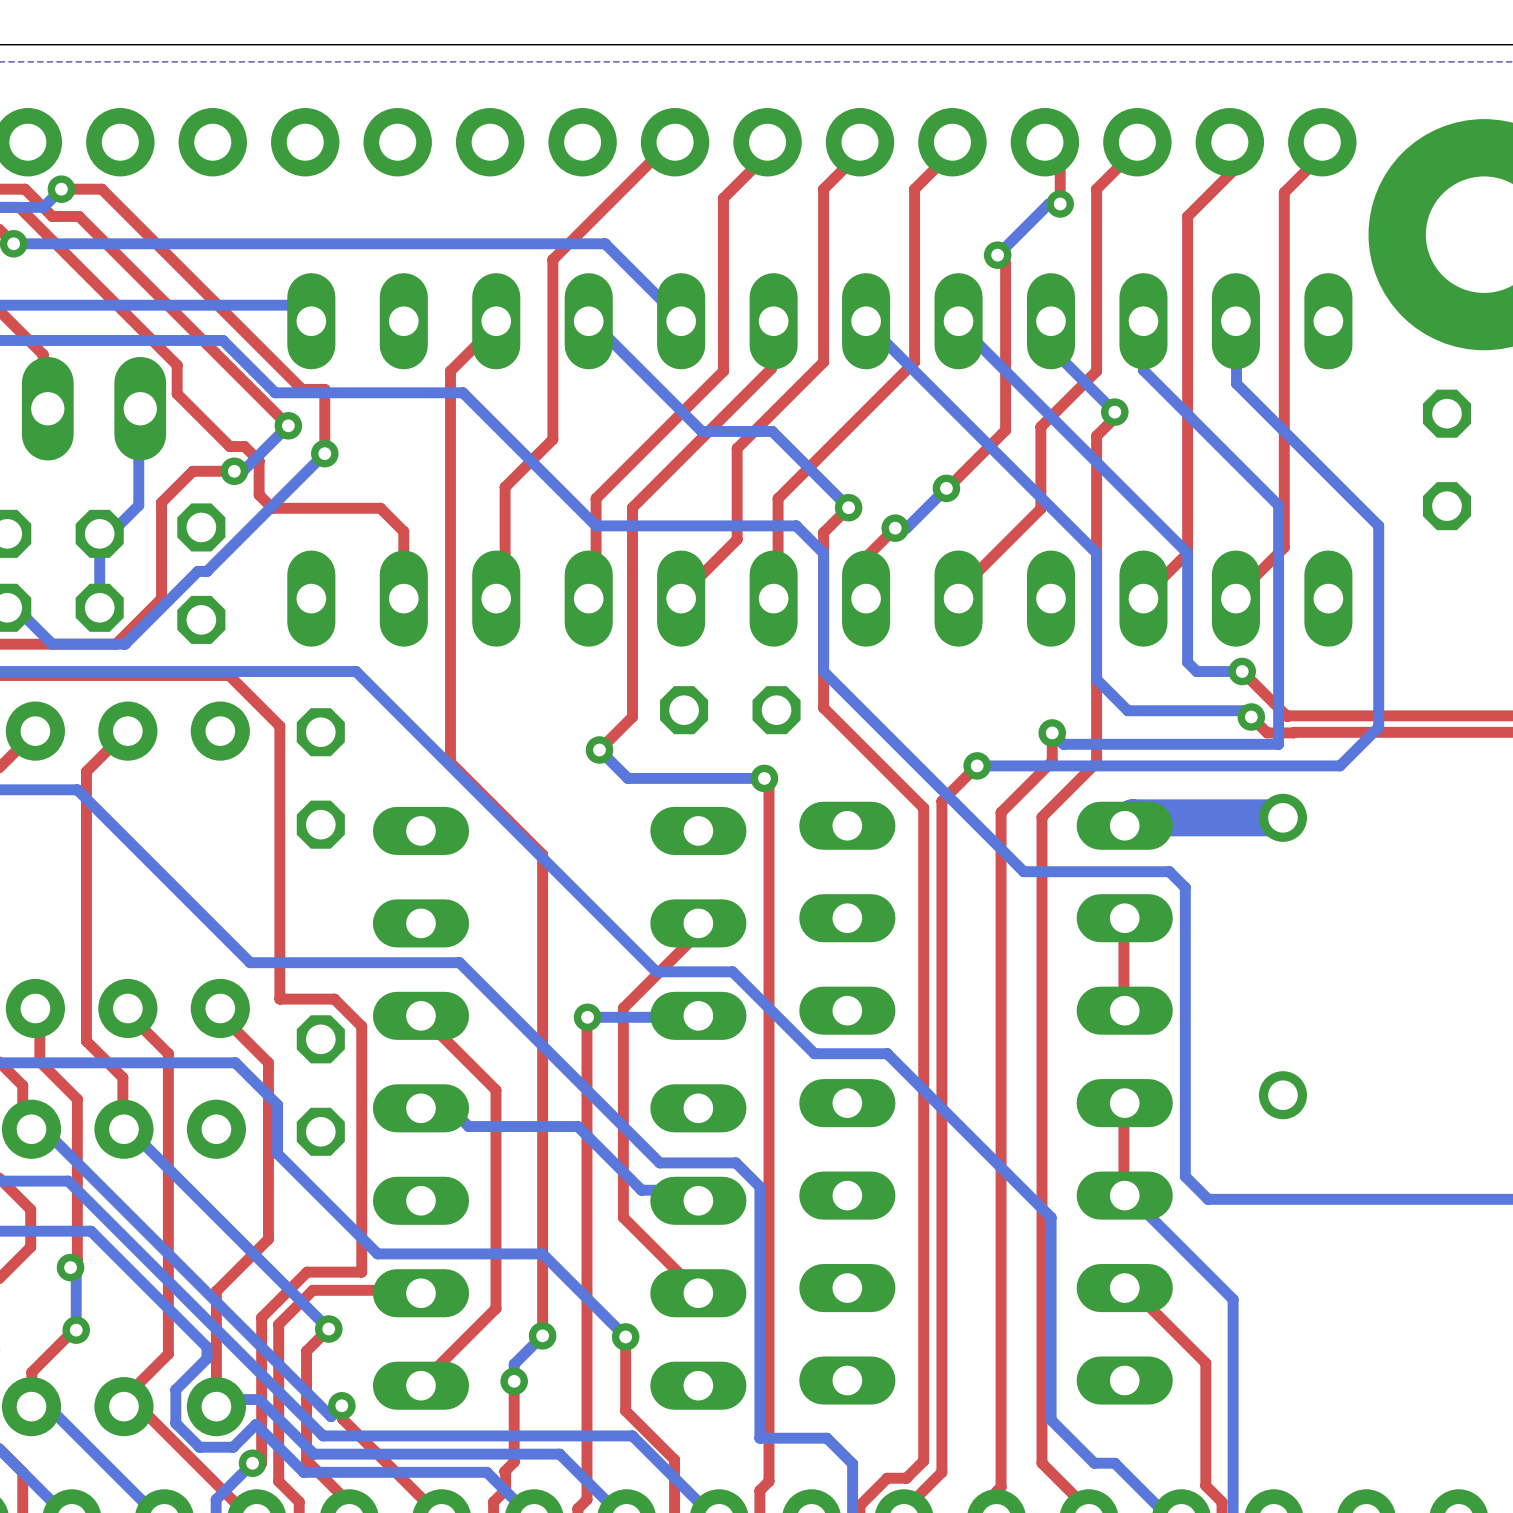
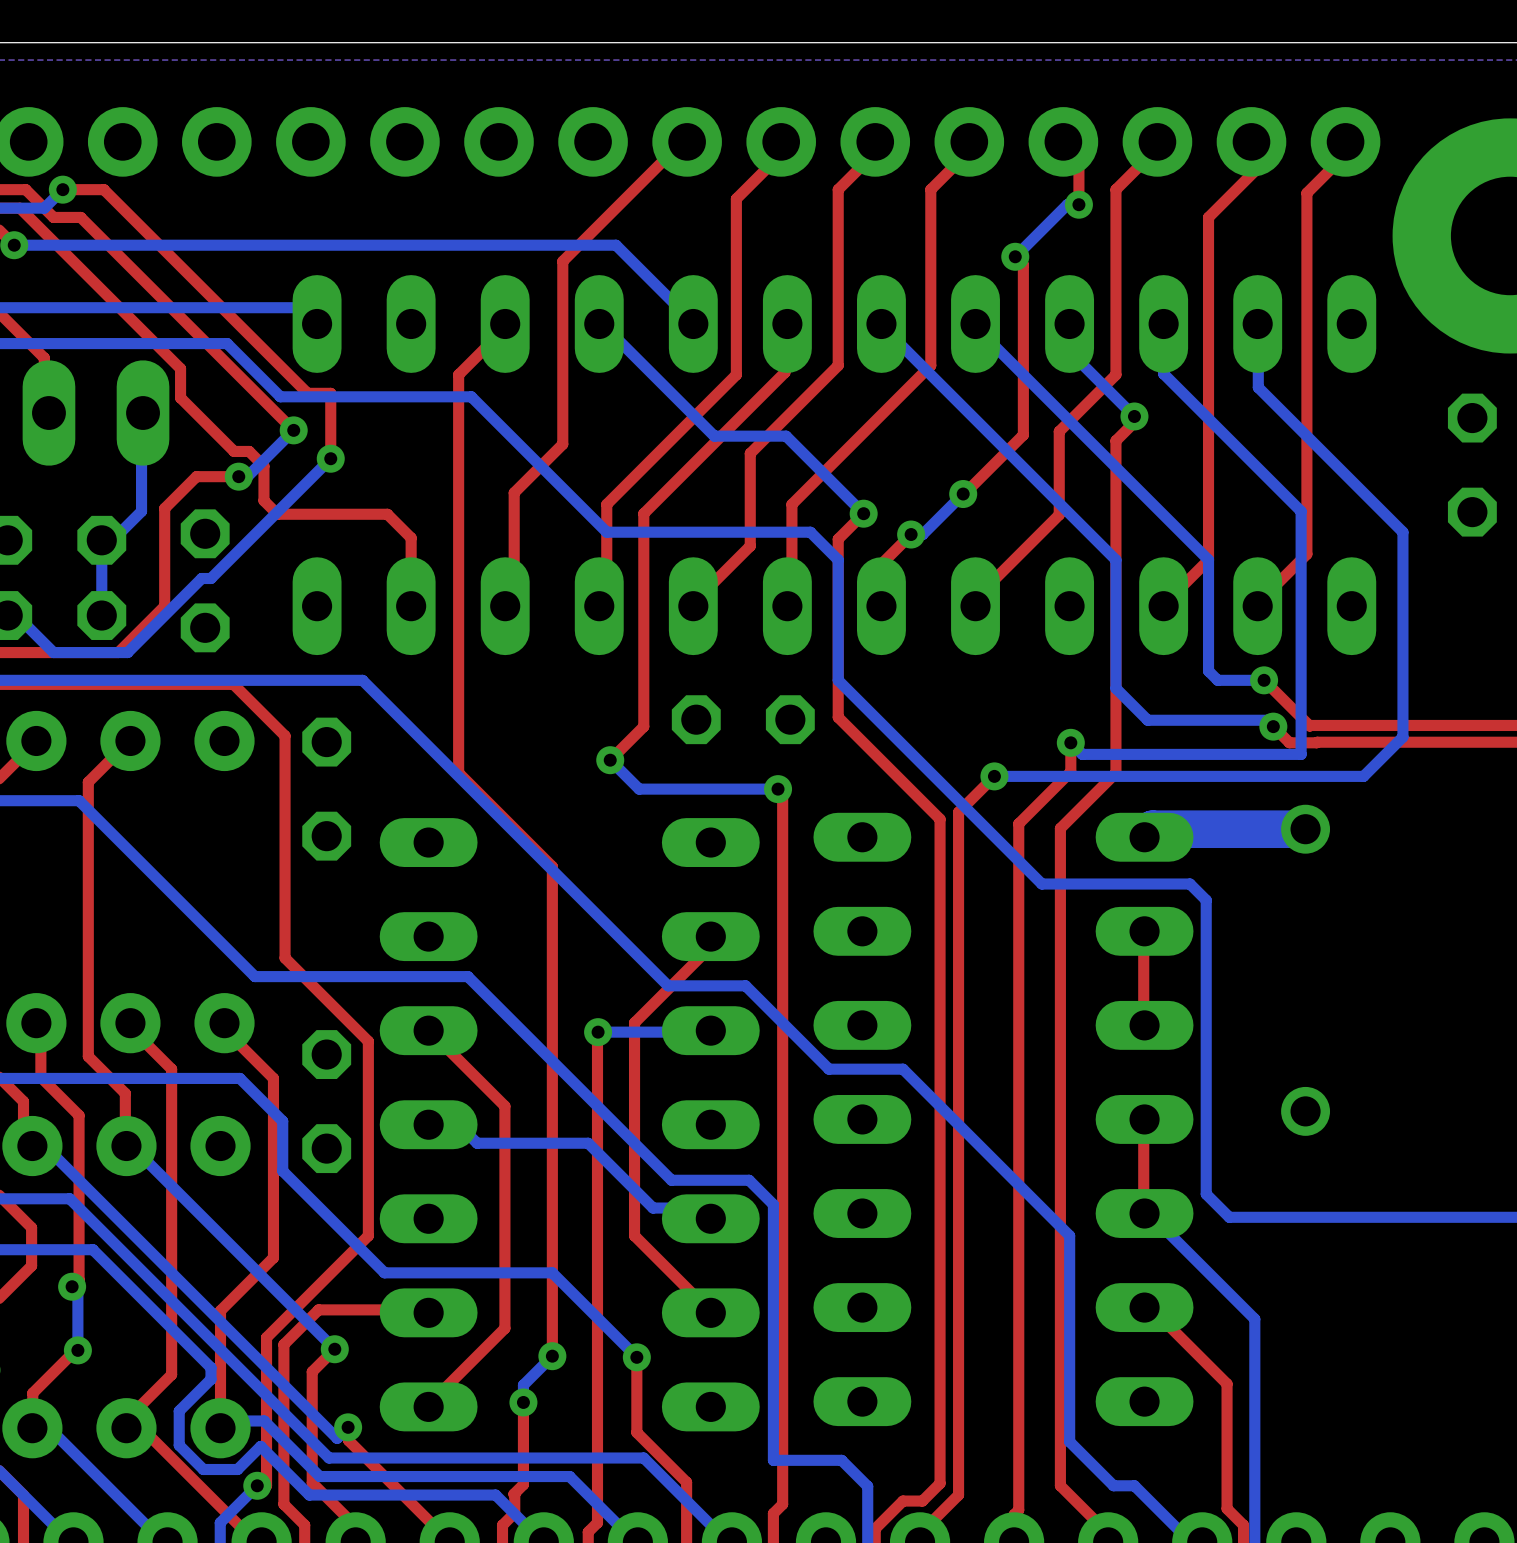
top track: (279, 944) (279, 999) (334, 999) -> (285, 958) (340, 1013)
top track: (361, 1217) (361, 1272) (307, 1272) -> (368, 1235) (312, 1291)

